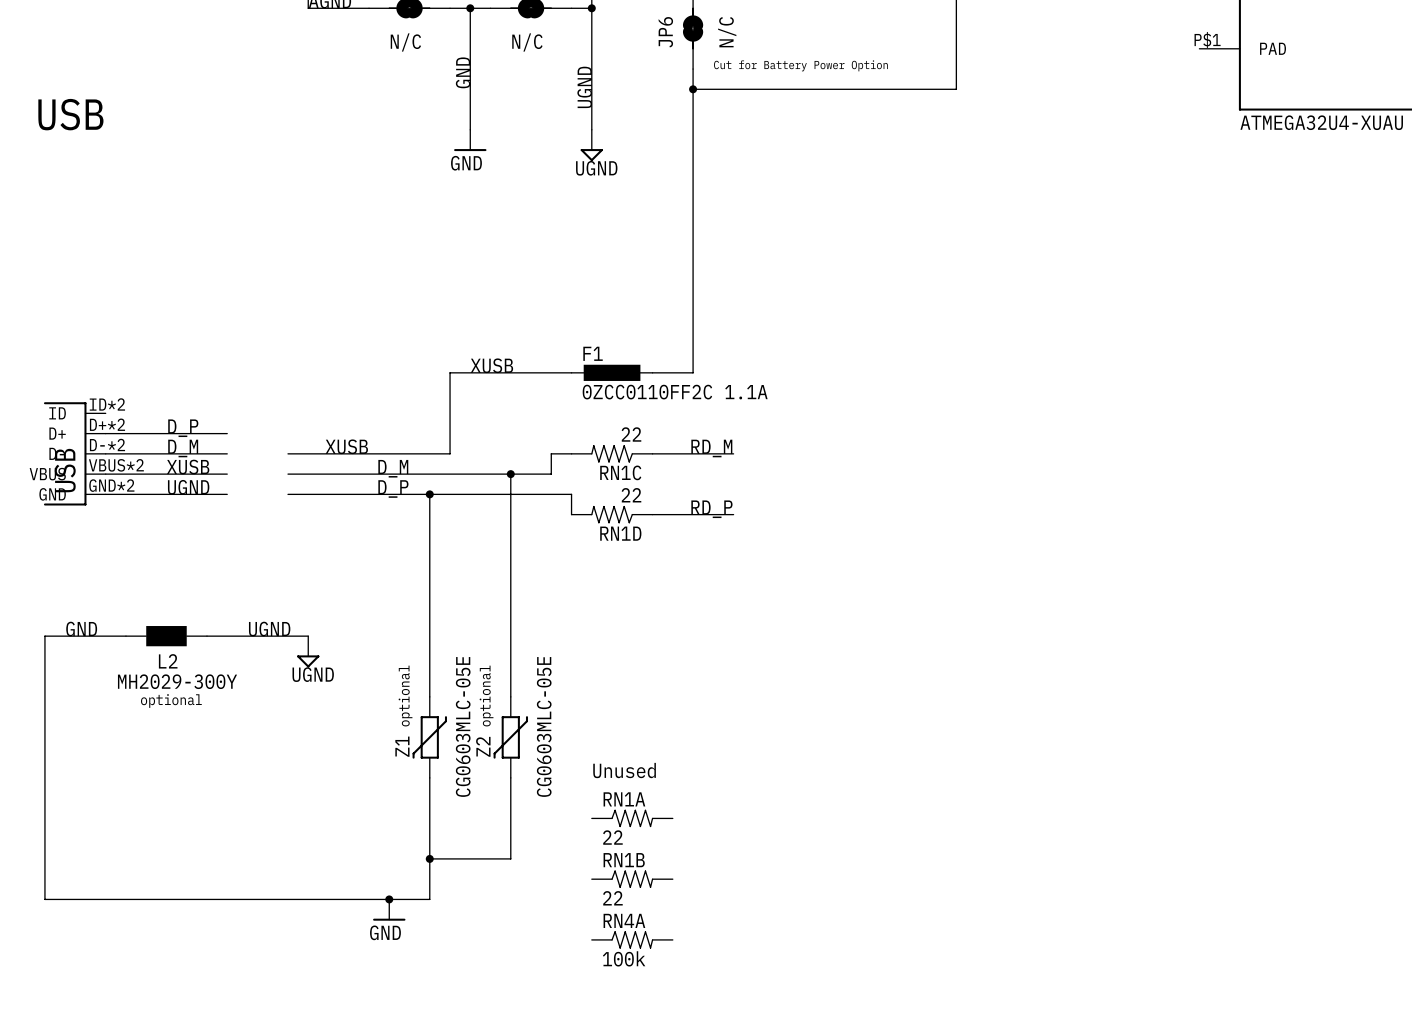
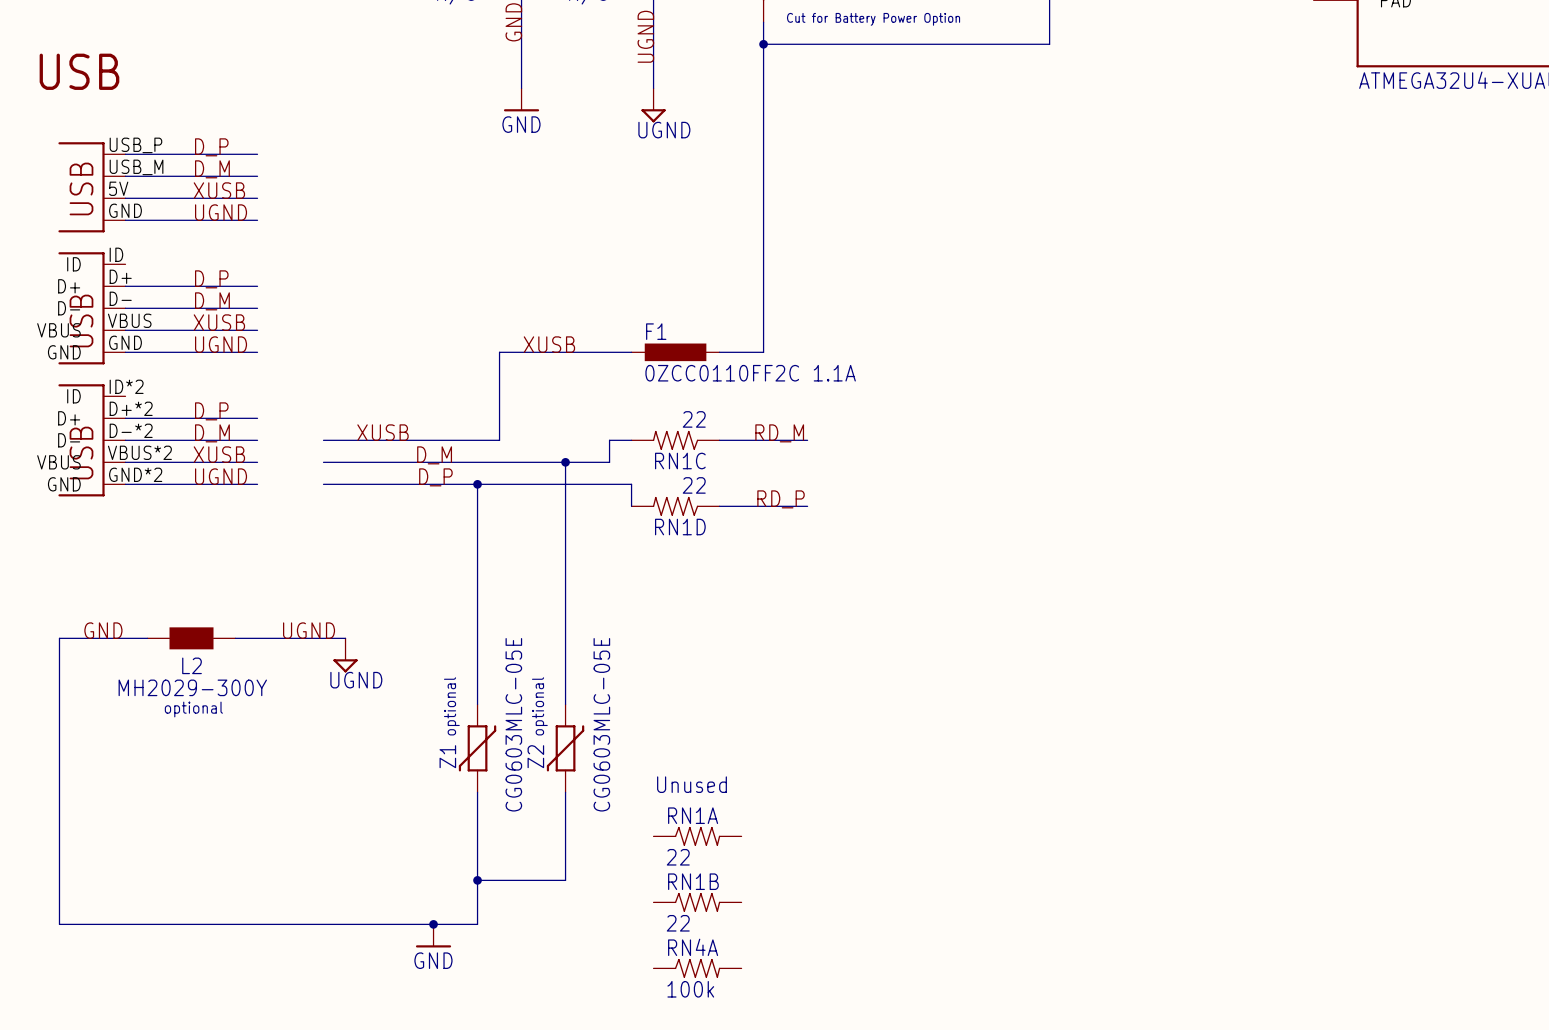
label: none -> D_P (211, 147)
wire: none -> (125, 154) (257, 154)
label: none -> D_M (212, 169)
wire: none -> (125, 176) (257, 176)
part: none -> (91, 187)
label: none -> XUSB (219, 190)
wire: none -> (125, 198) (257, 198)
label: none -> UGND (221, 212)
wire: none -> (125, 220) (257, 220)
label: none -> D_P (211, 279)
wire: none -> (125, 286) (257, 286)
label: none -> D_M (212, 301)
part: none -> (91, 308)
wire: none -> (125, 308) (257, 308)
label: none -> XUSB (219, 322)
wire: none -> (125, 330) (257, 330)
label: none -> UGND (221, 344)
wire: none -> (125, 352) (257, 352)

